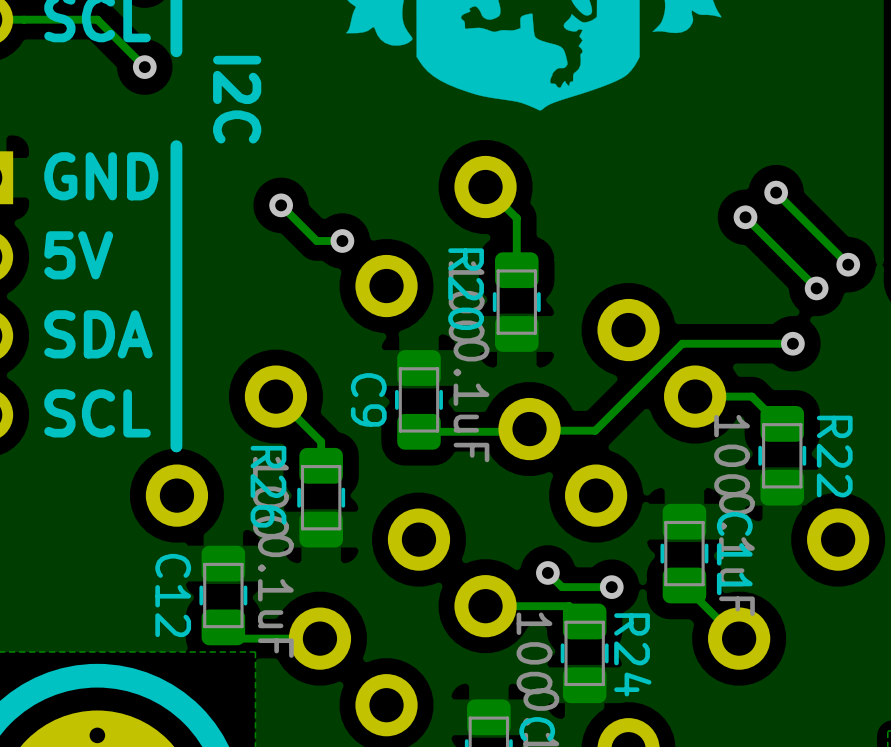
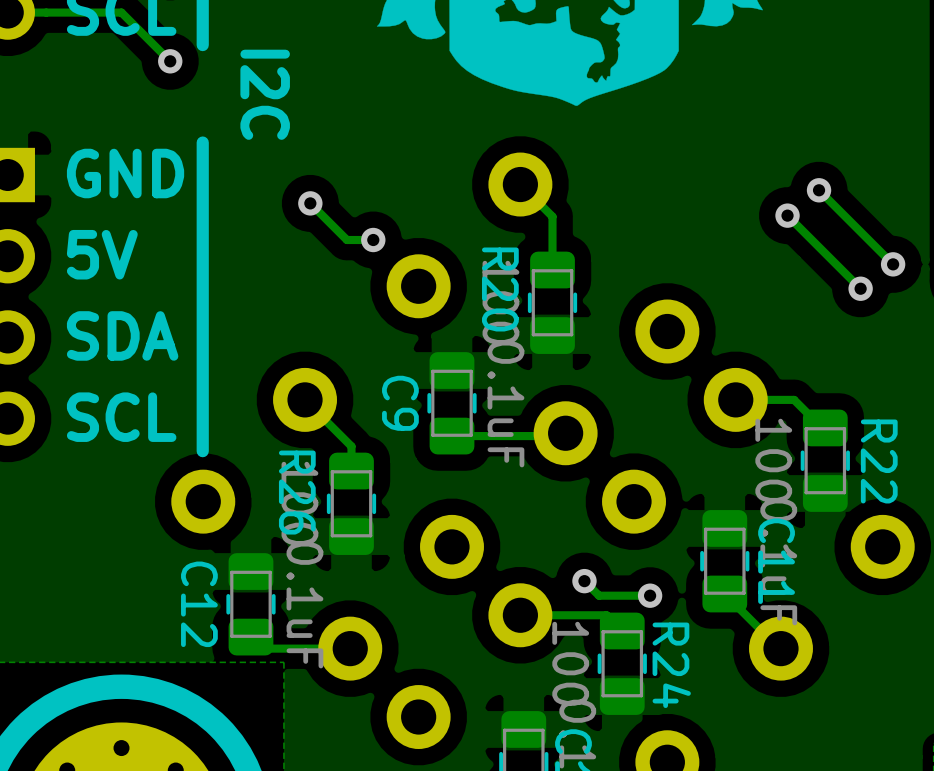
track: (792, 343) (682, 343) (595, 430) (532, 430) -> none
via: (792, 343) -> none

